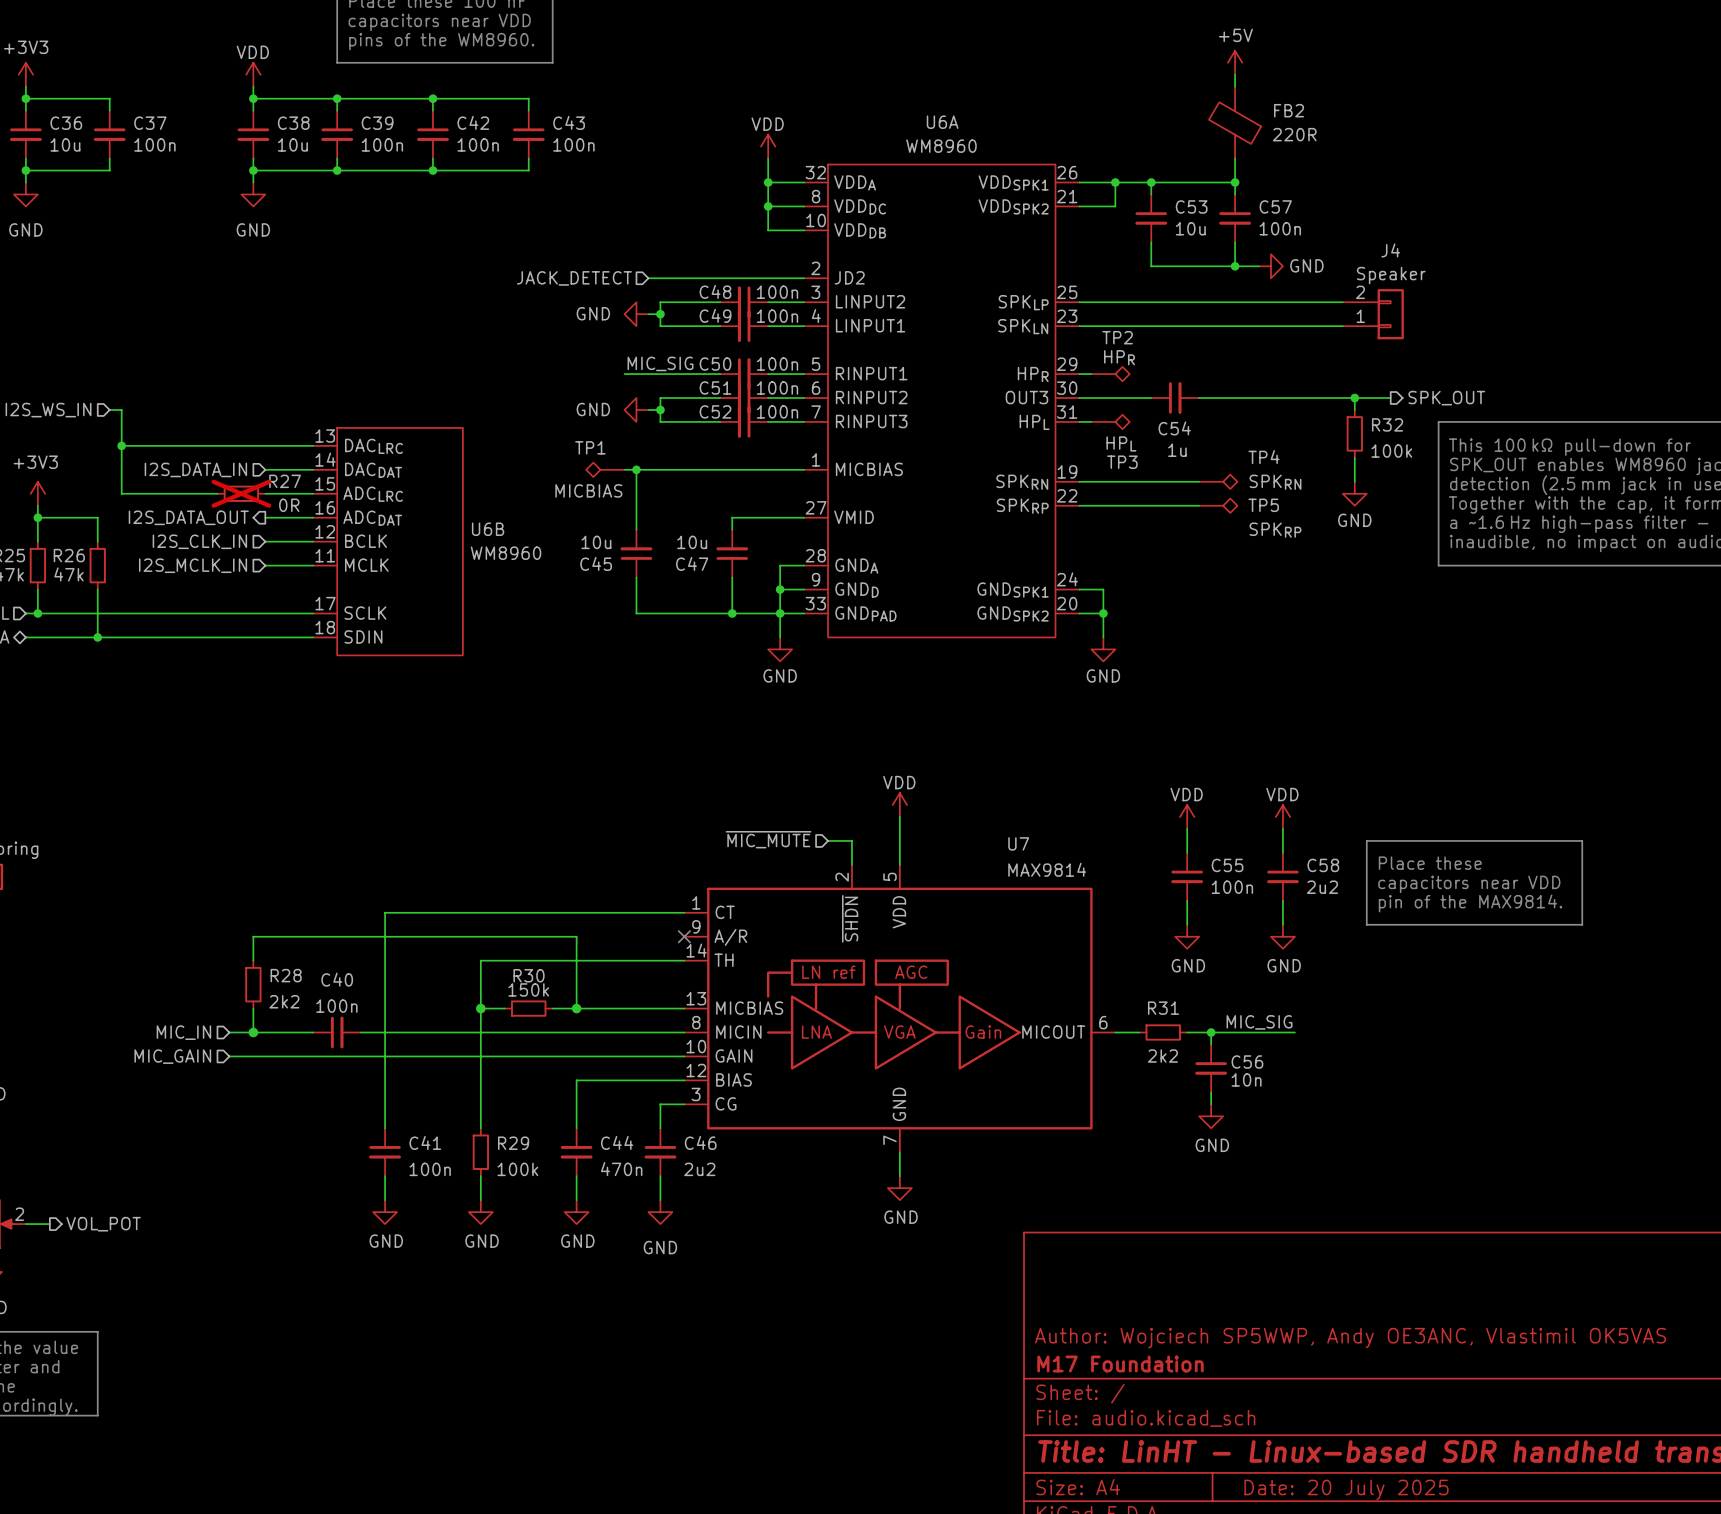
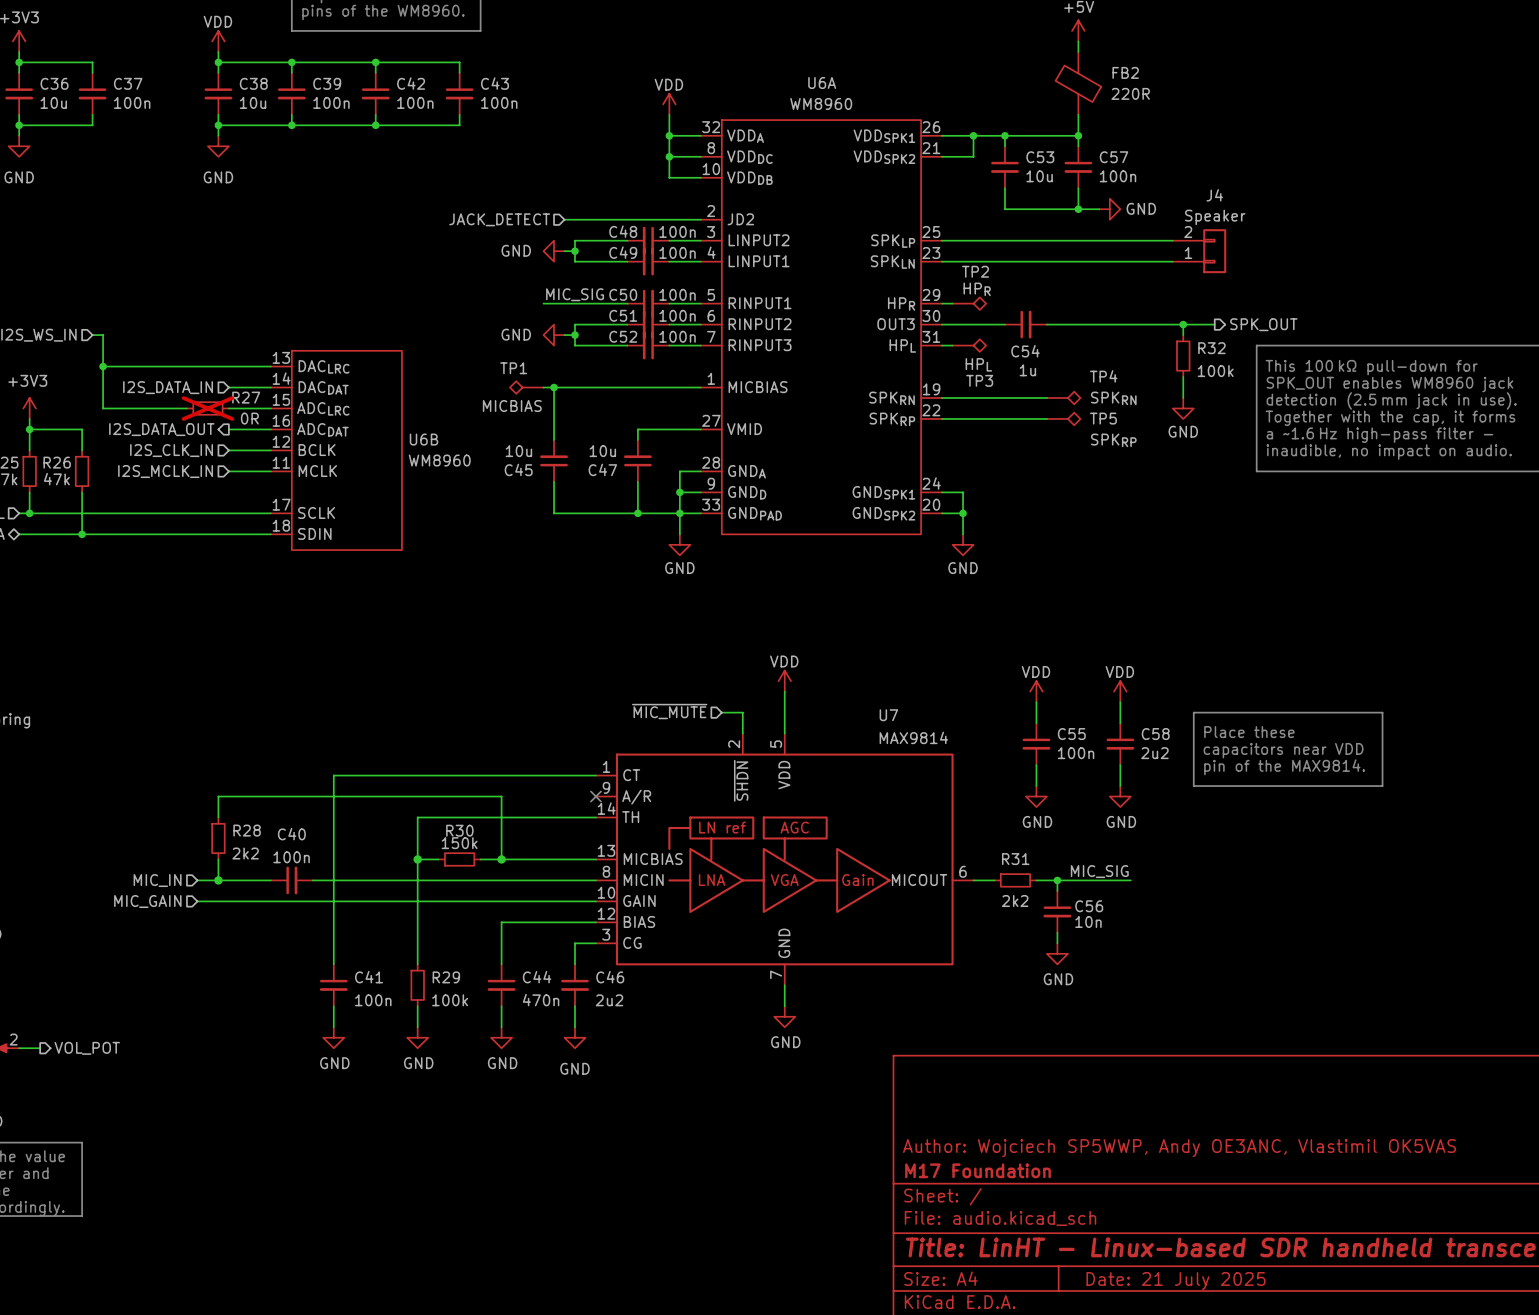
title block: Date: 20 July 2025 (1346, 1489) -> Date: 21 July 2025 (1175, 1281)

